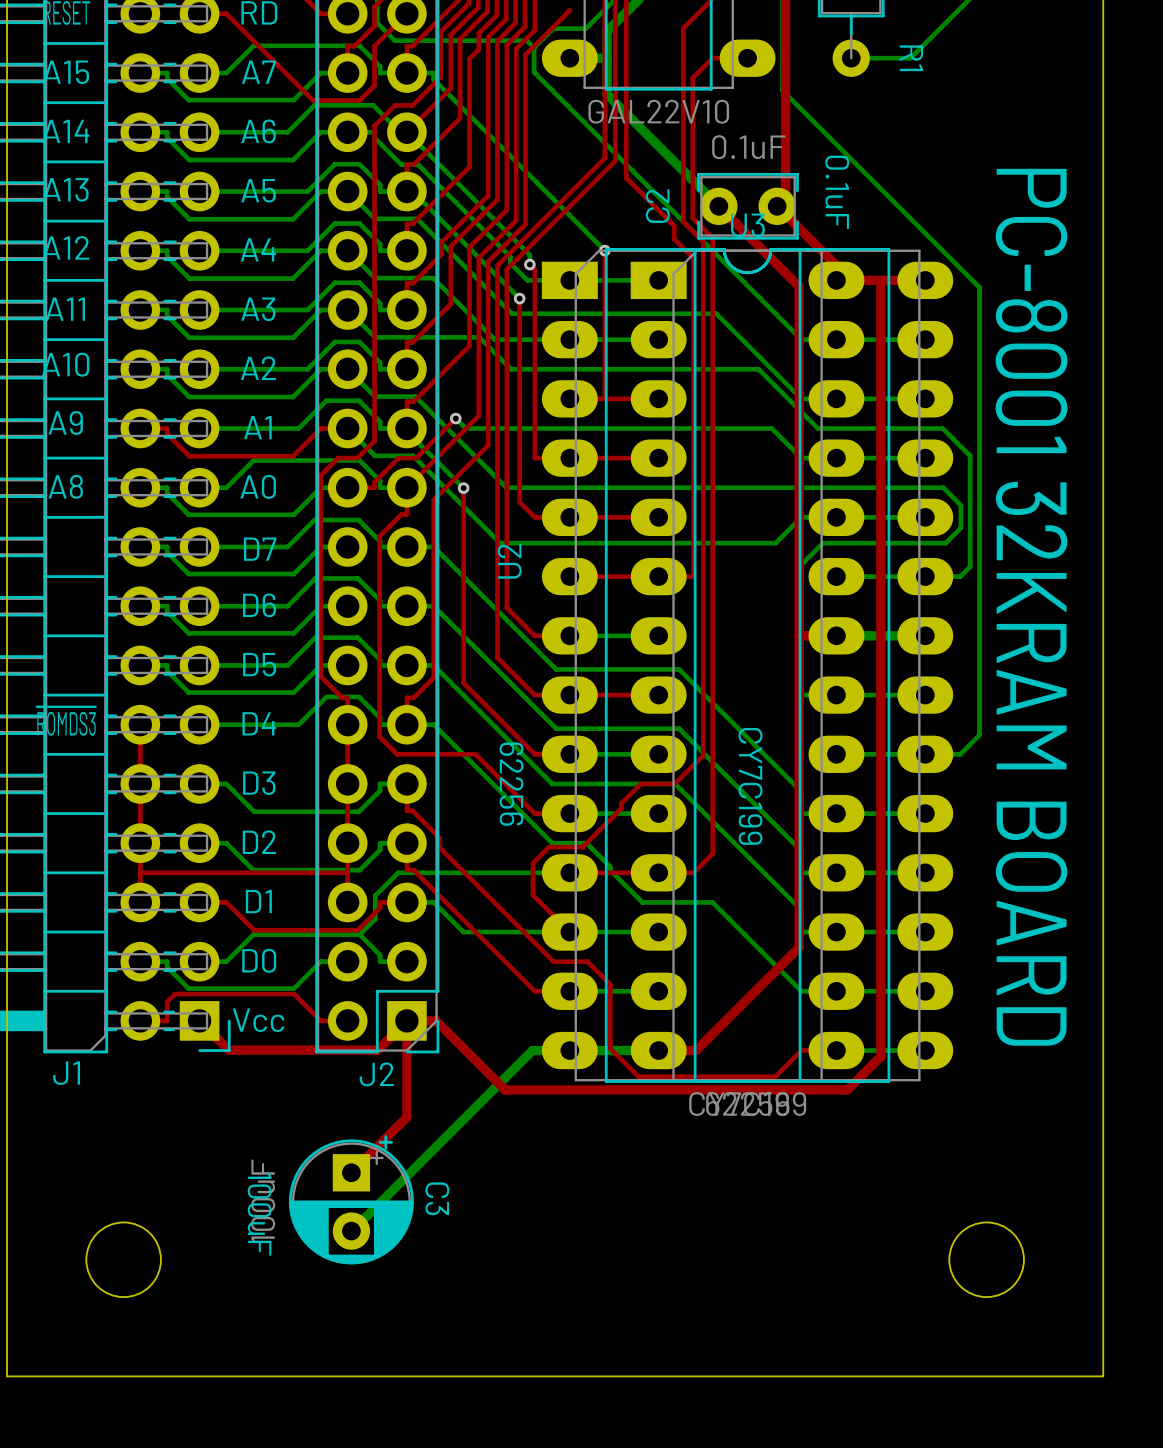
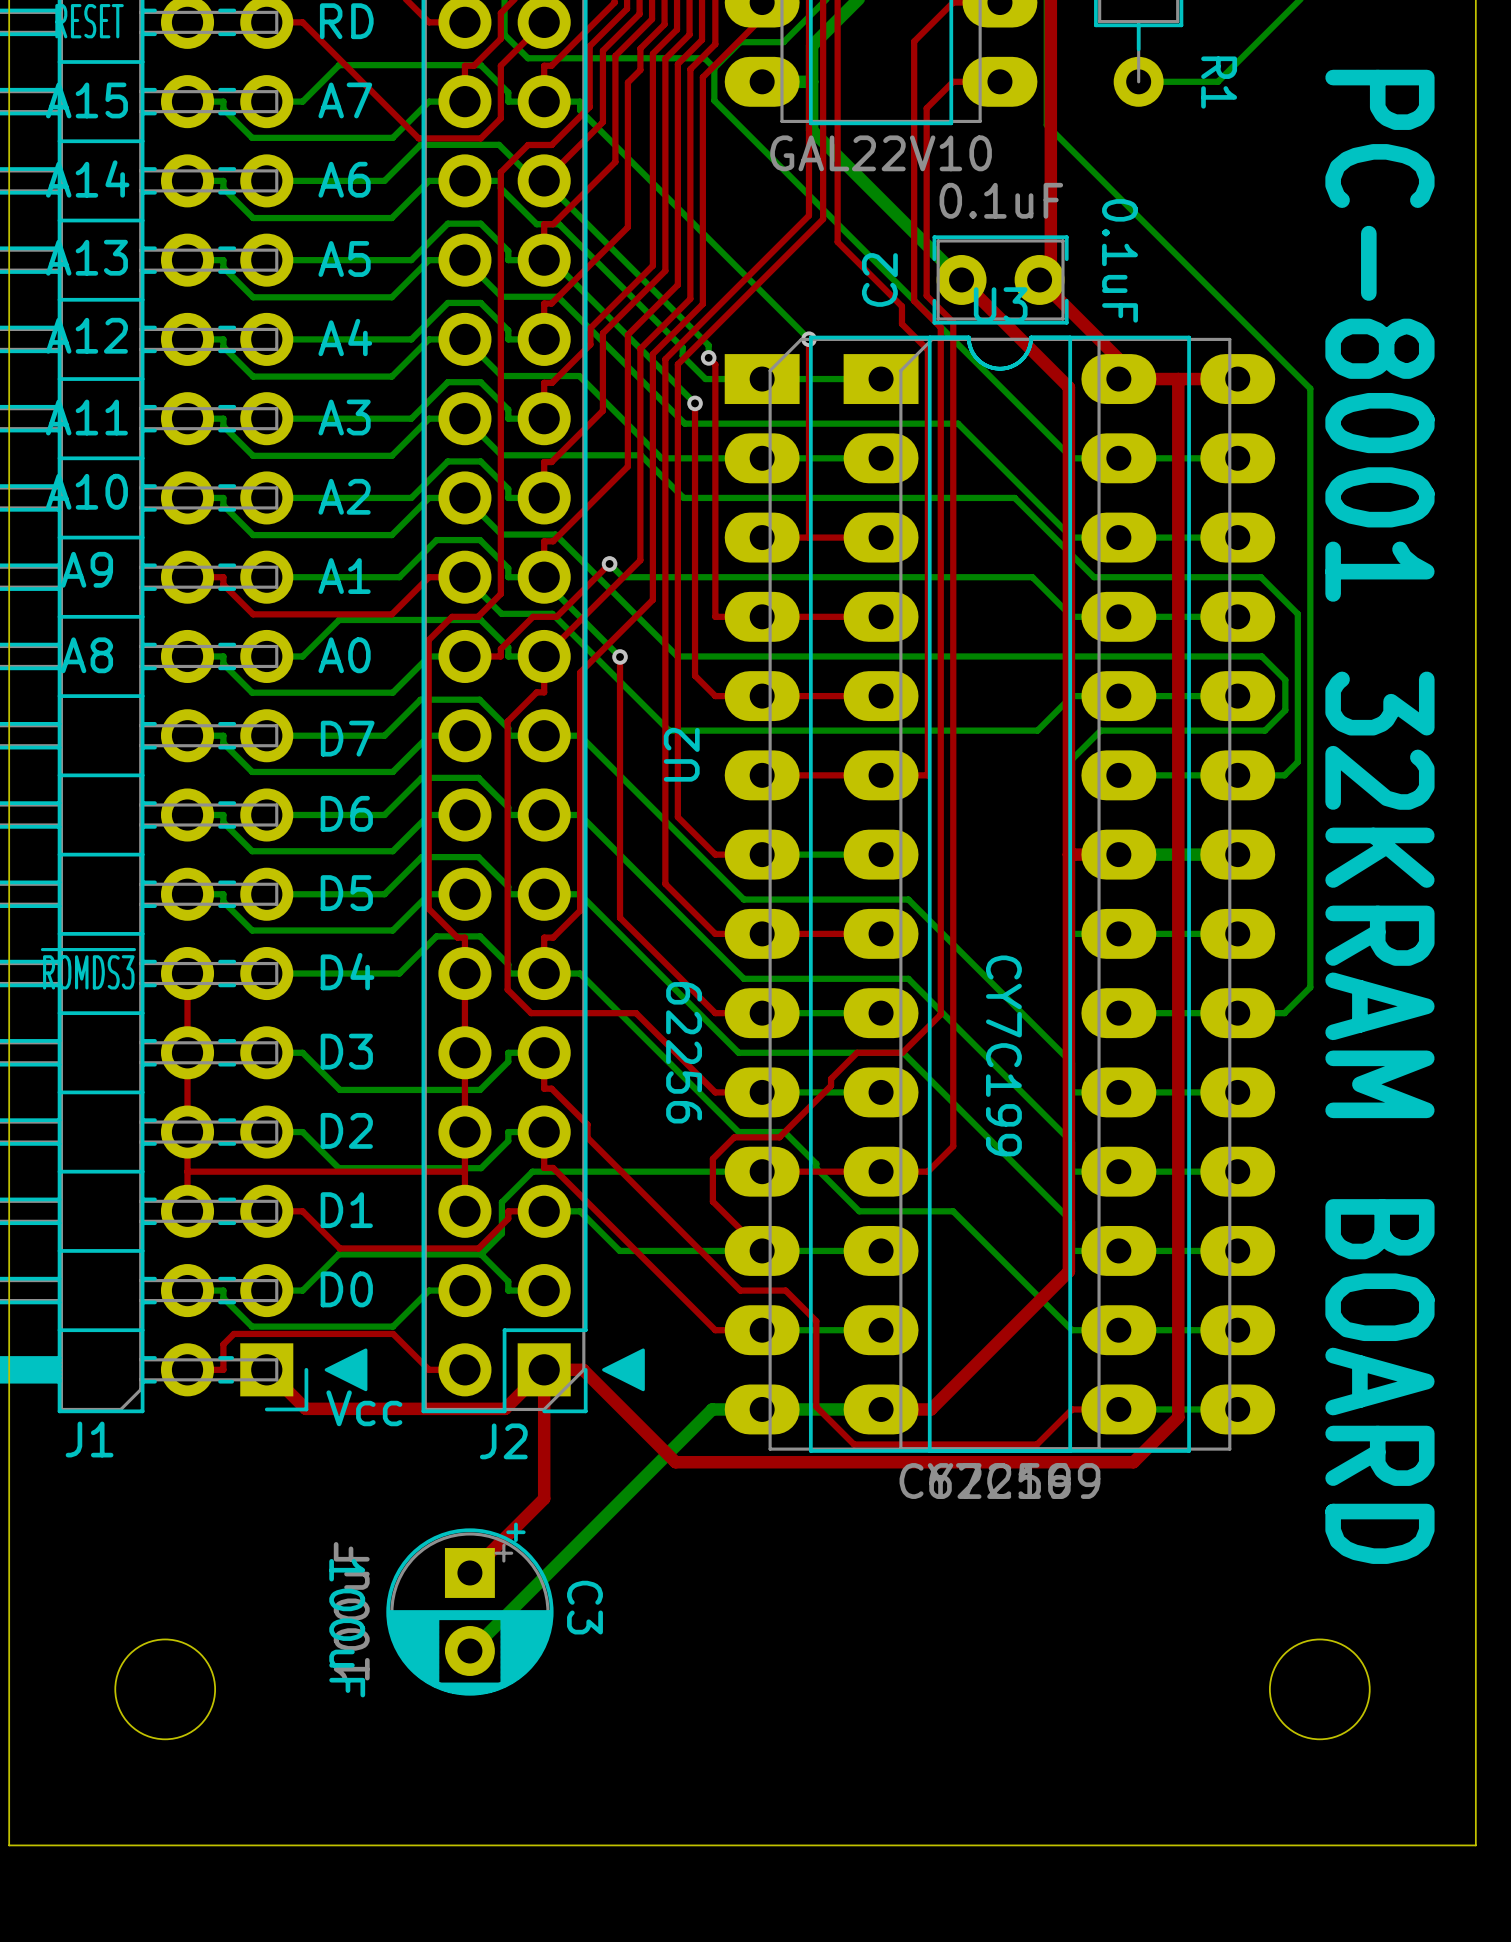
drawing: none -> [324, 1348, 368, 1392]
drawing: none -> [602, 1348, 645, 1392]
text position: Vcc (258, 1020) -> Vcc (364, 1408)

